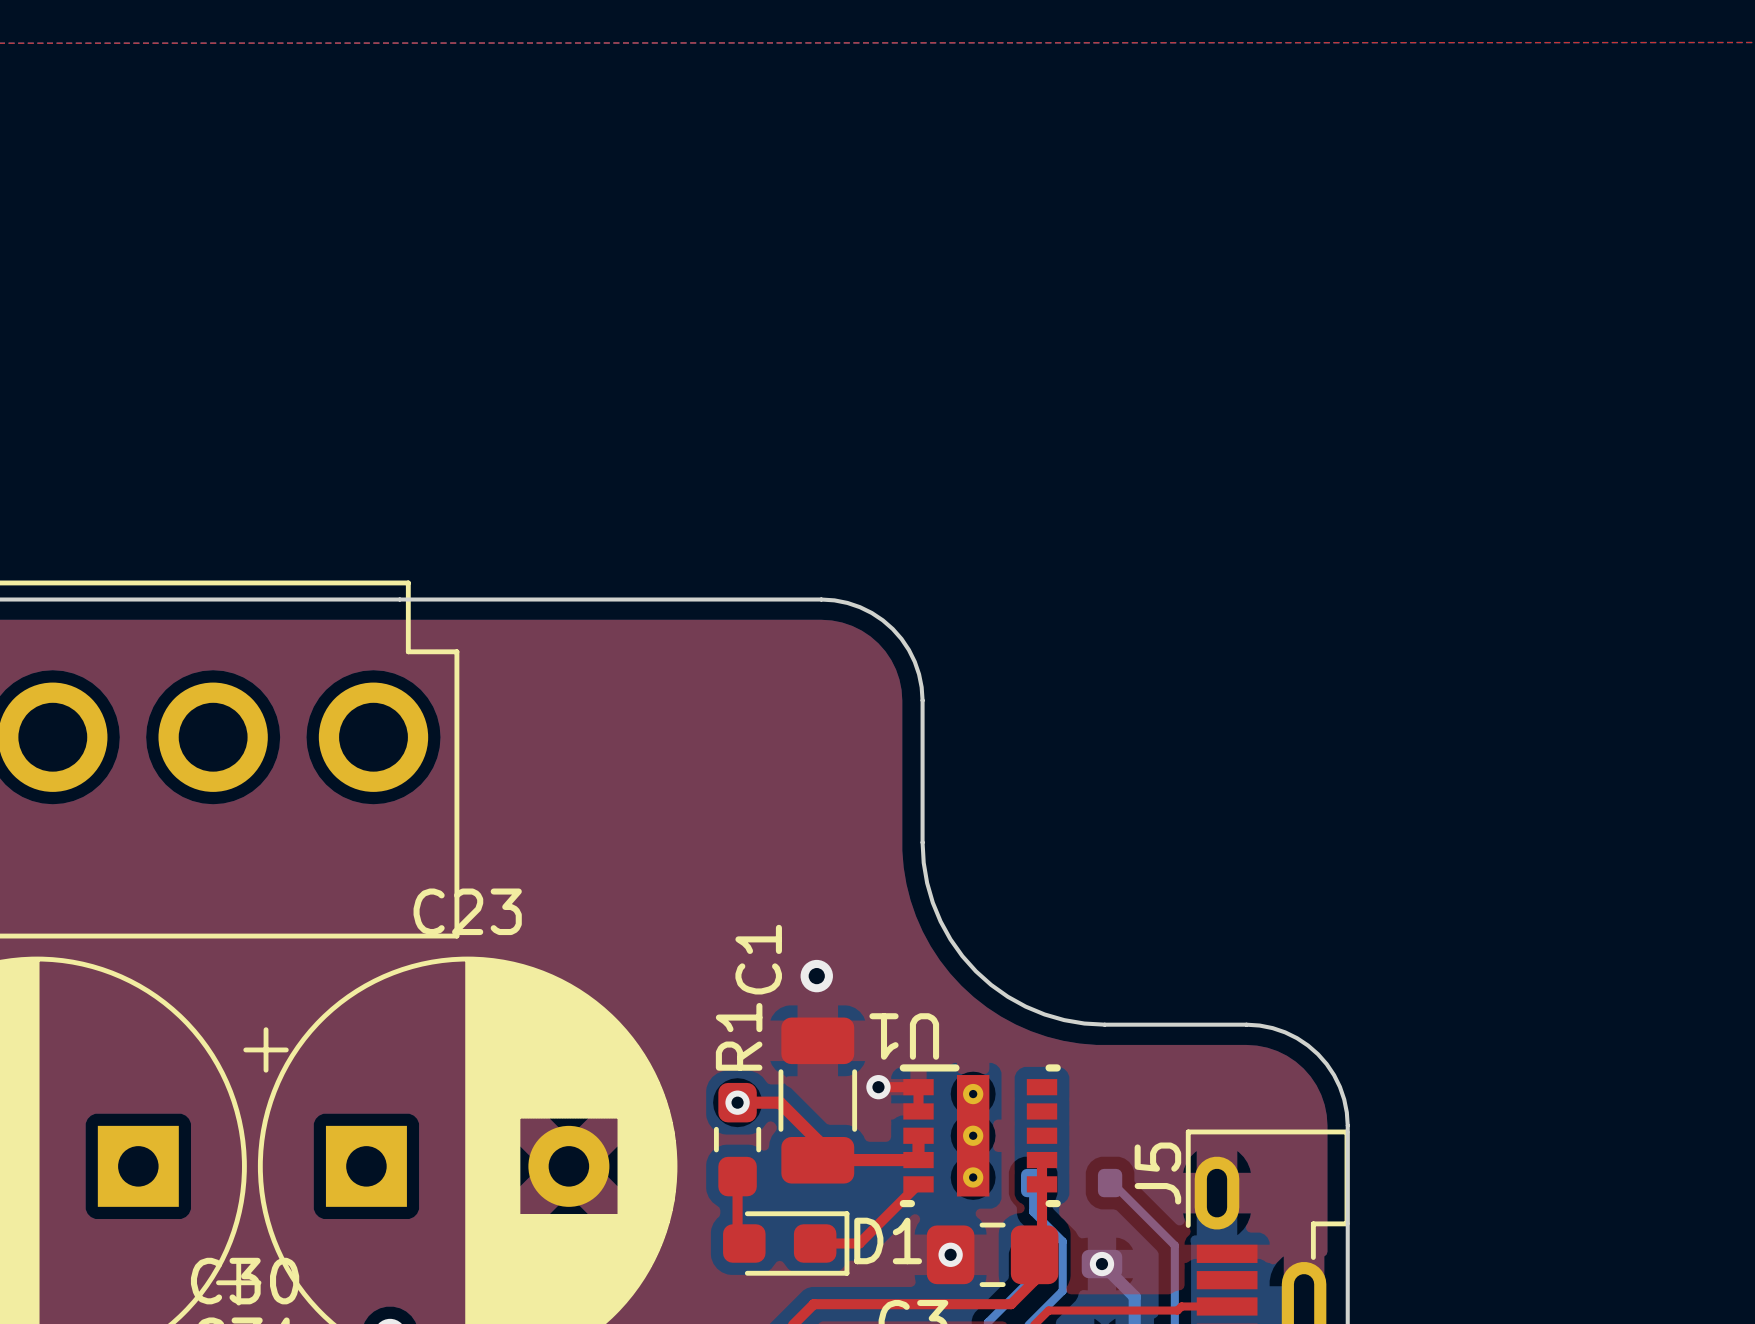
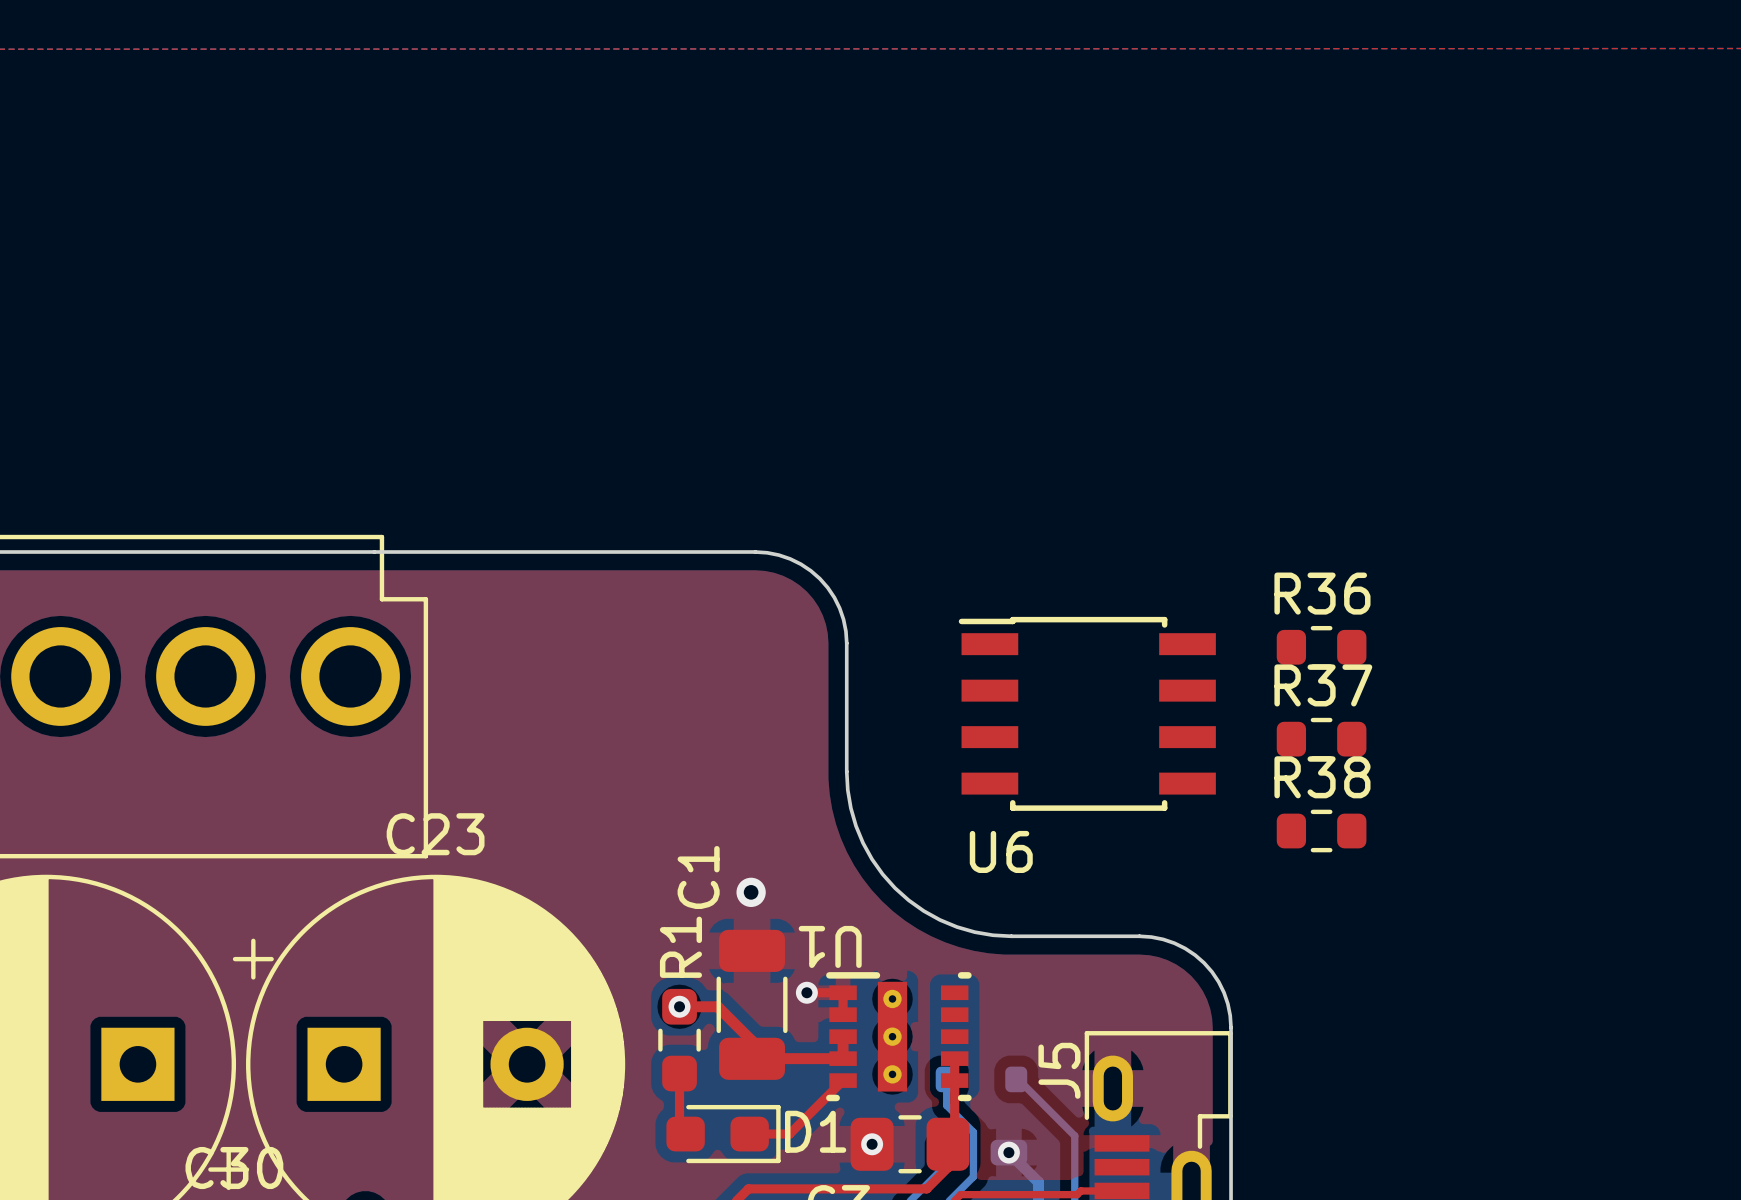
R36: none -> (1321, 647)
U6: none -> (1087, 713)
R37: none -> (1321, 739)
R38: none -> (1321, 831)

